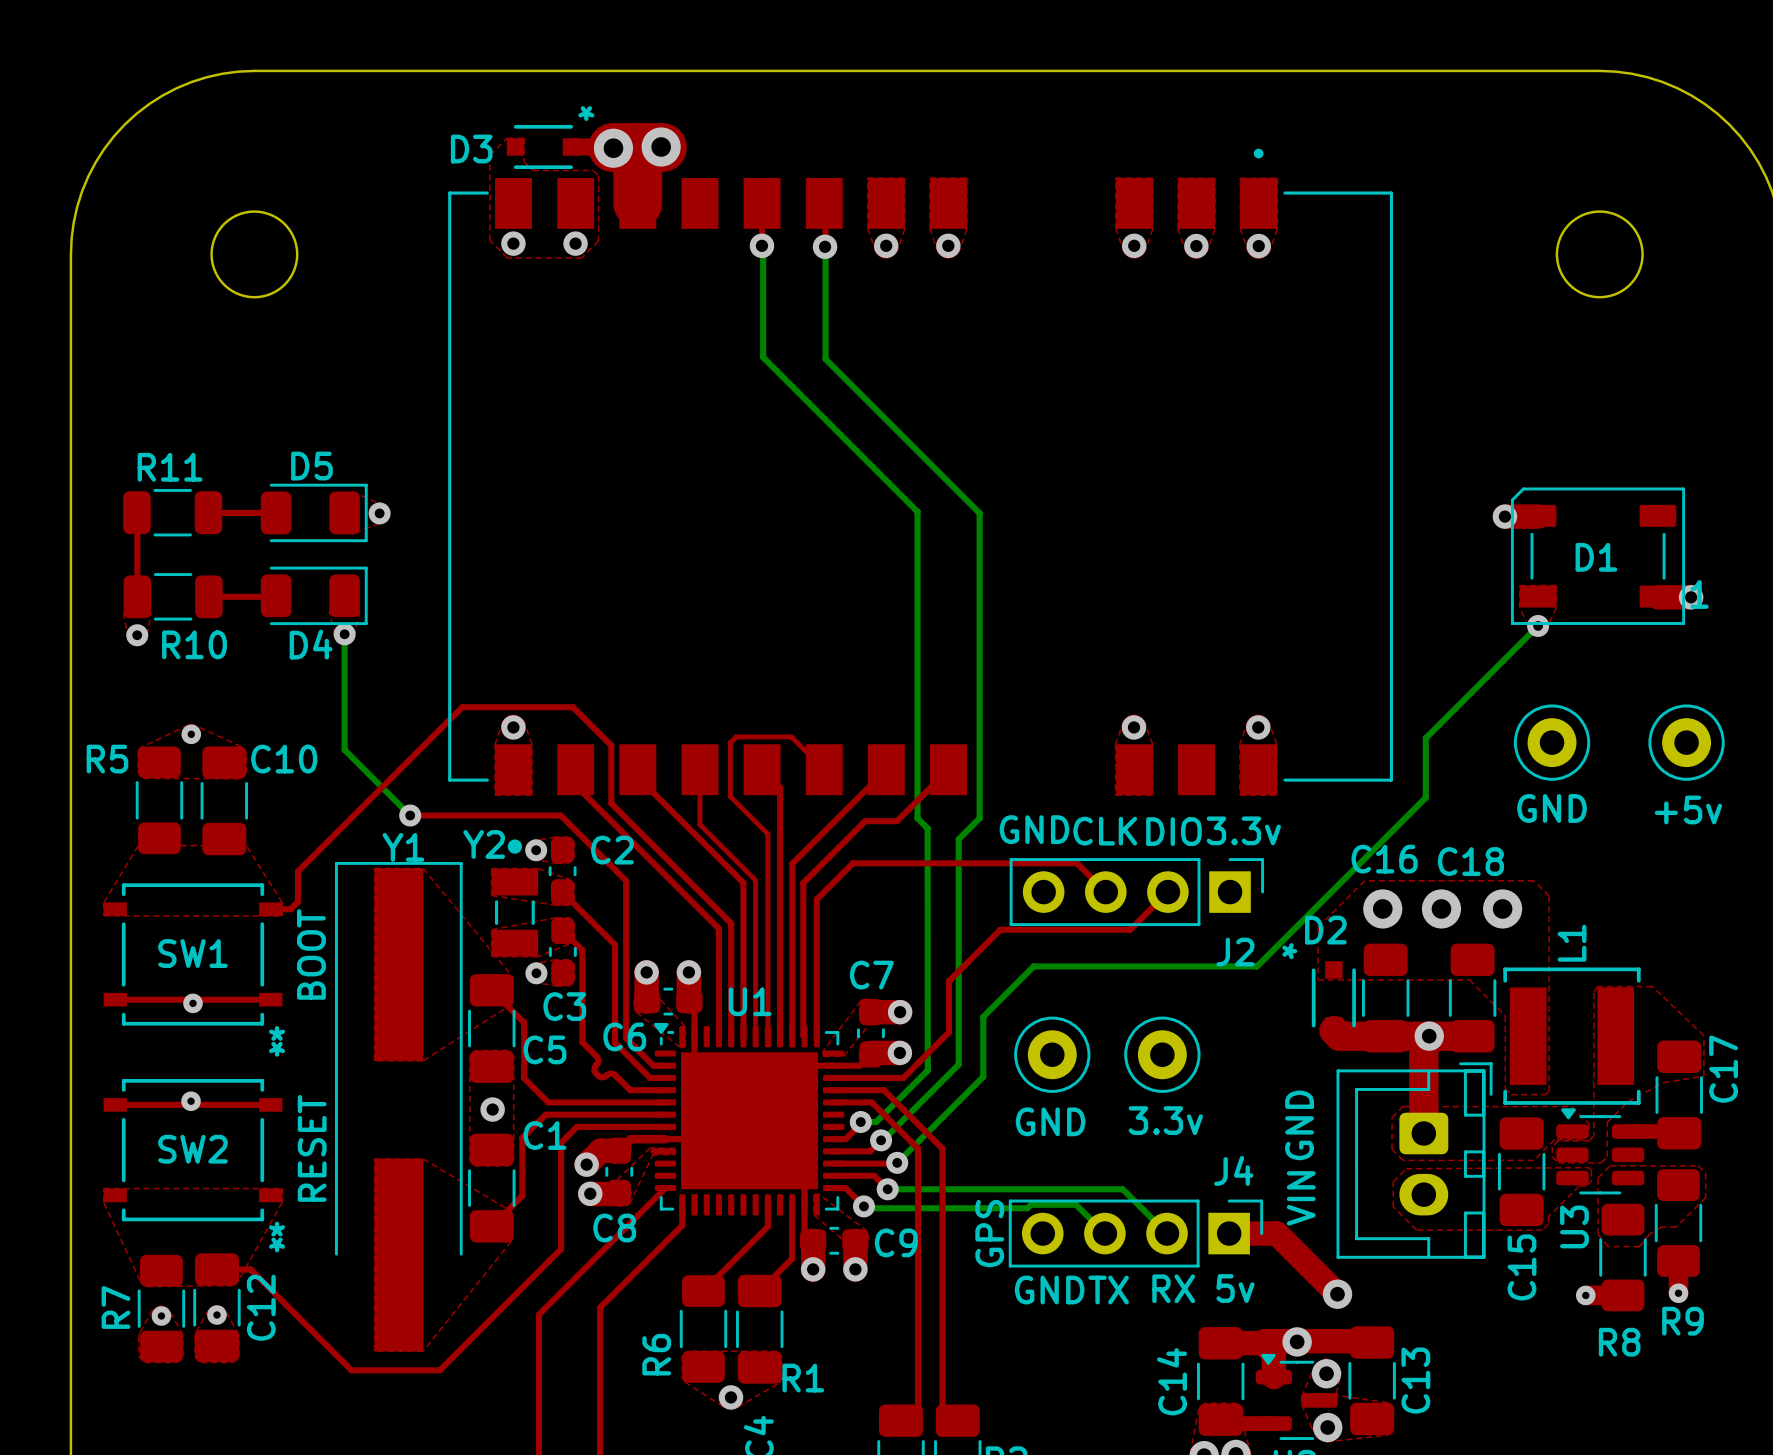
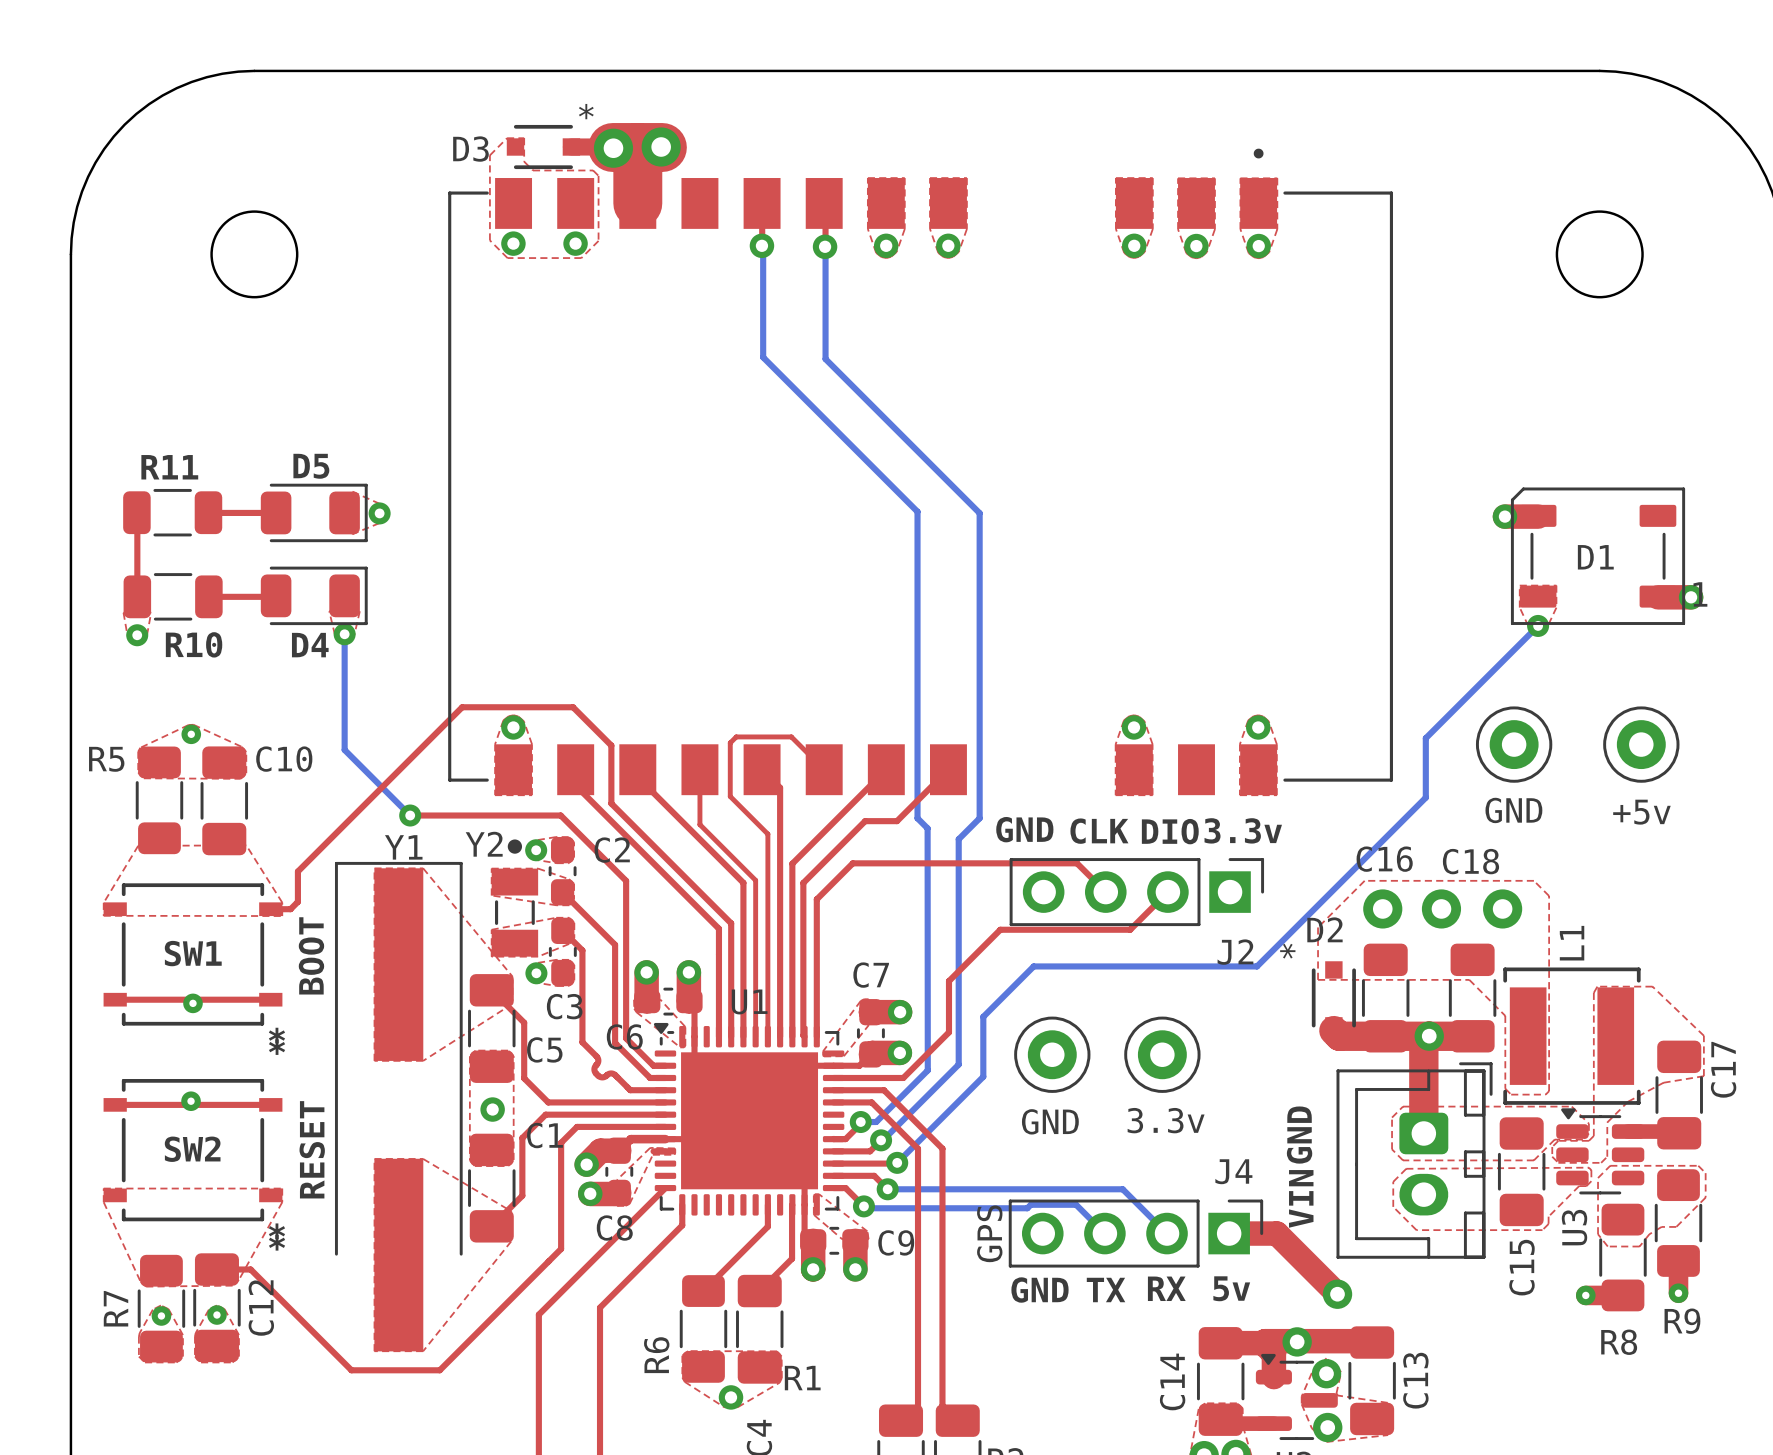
part position: (1552, 742) -> (1514, 744)
part position: (1686, 742) -> (1641, 744)

